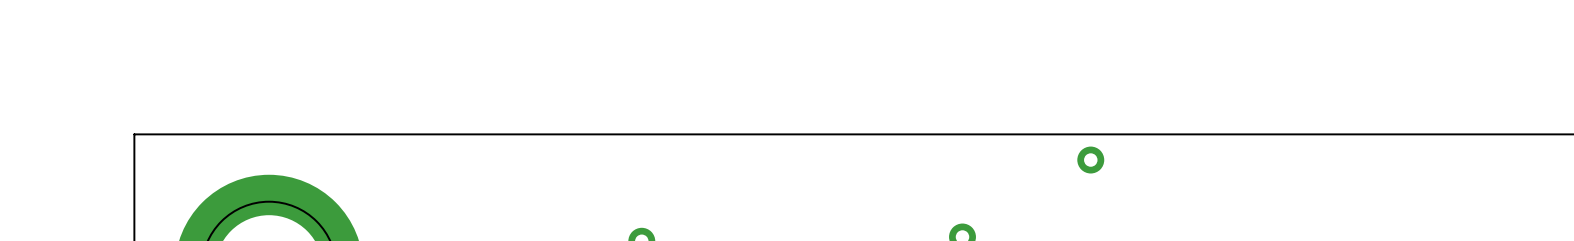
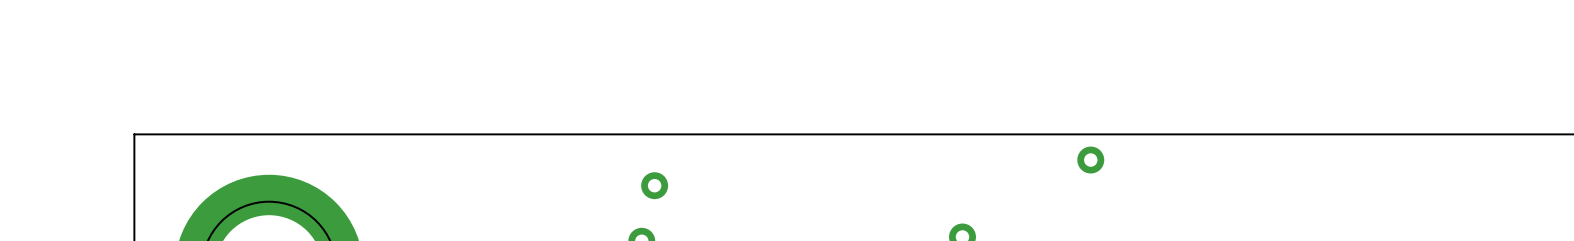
via: none -> (654, 185)

